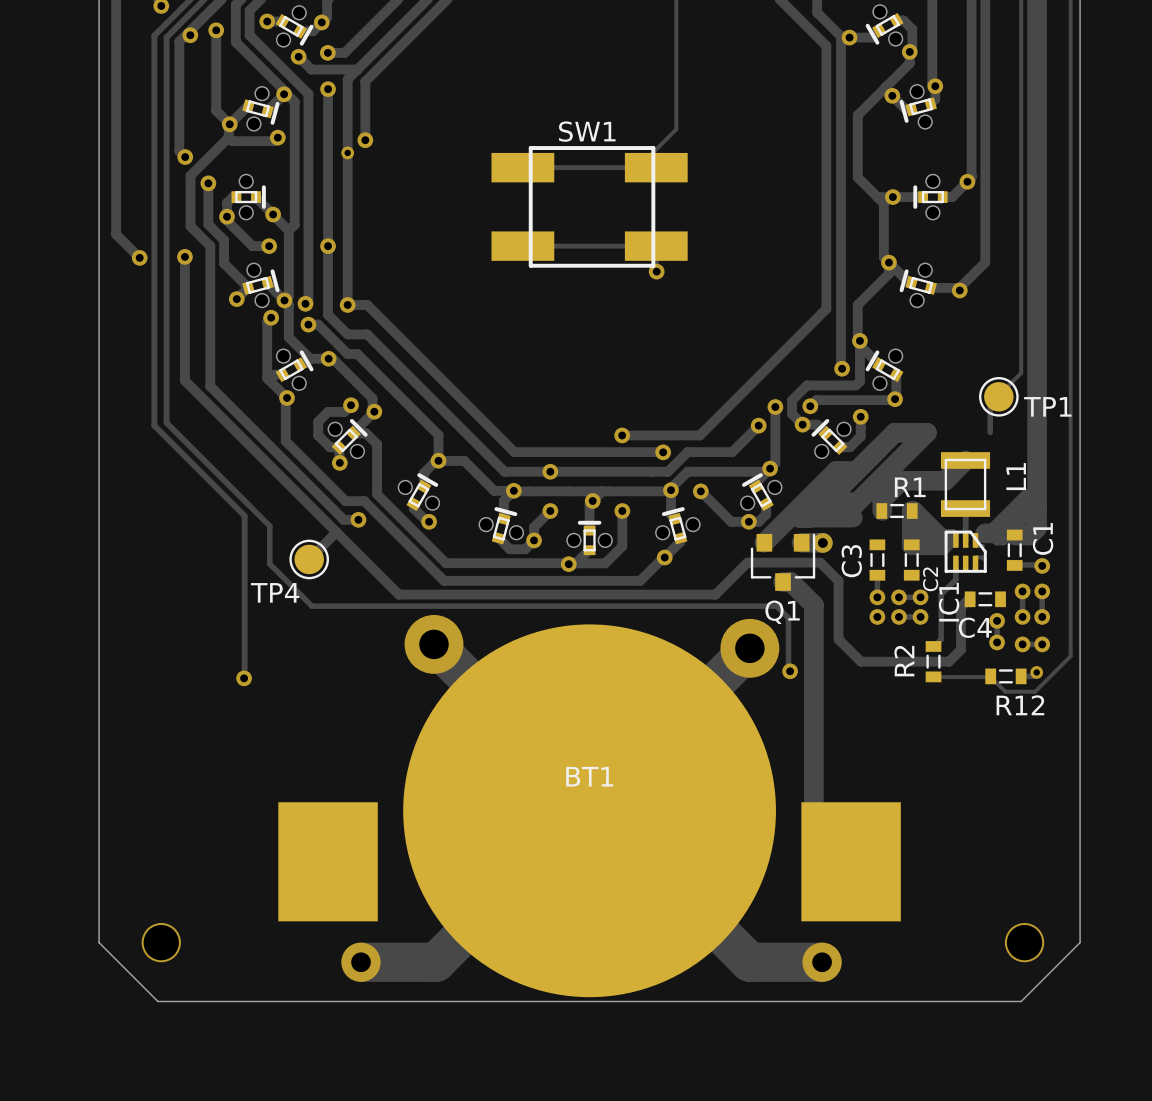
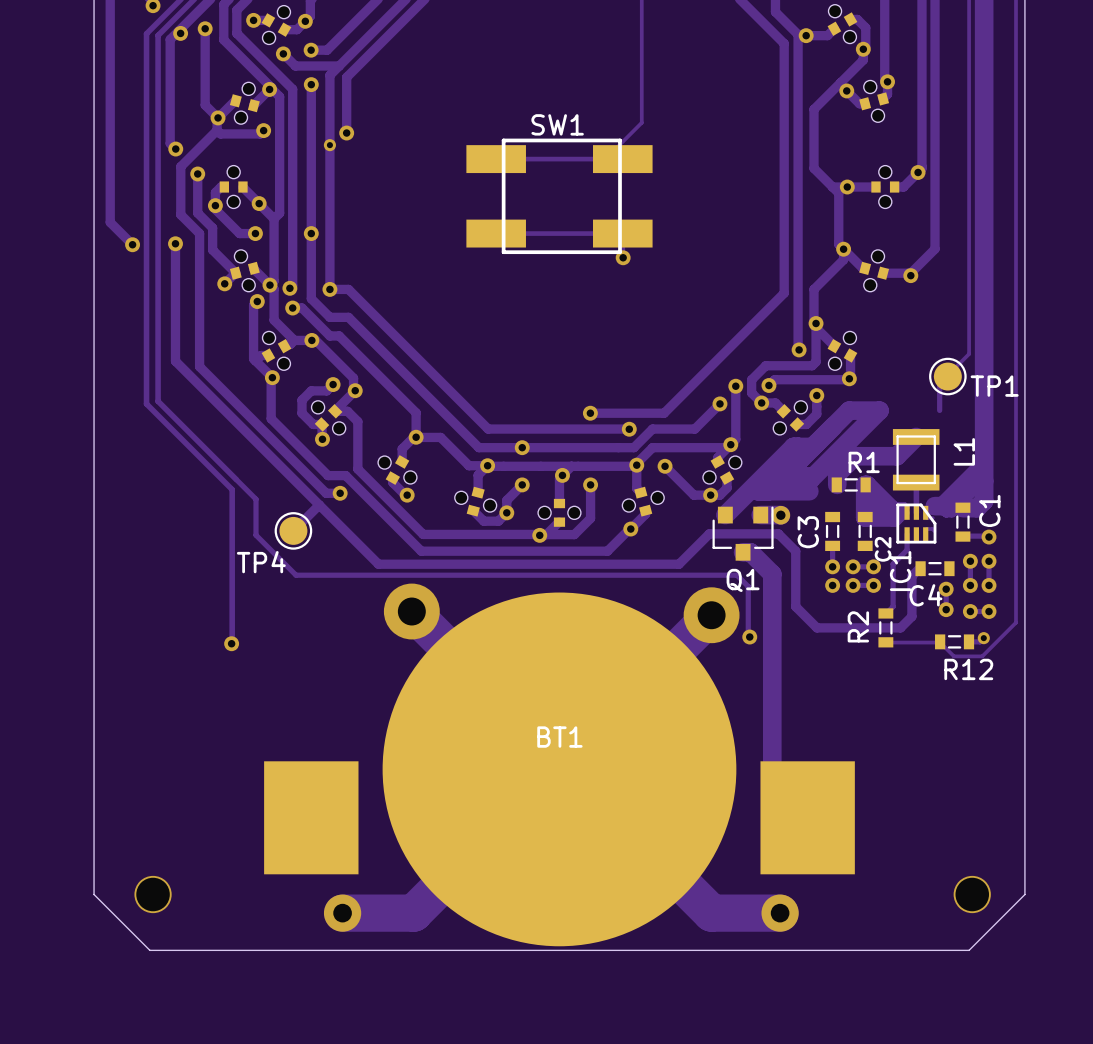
part footprint: [865, 4, 904, 46] -> [827, 4, 858, 44]
part footprint: [275, 5, 314, 47] -> [261, 5, 292, 45]
part footprint: [899, 84, 937, 129] -> [859, 80, 890, 123]
part footprint: [242, 86, 280, 131] -> [229, 82, 260, 125]
part footprint: [231, 174, 266, 220] -> [219, 165, 248, 209]
part footprint: [913, 174, 948, 220] -> [871, 165, 900, 209]
part footprint: [242, 263, 280, 308] -> [229, 249, 260, 292]
part footprint: [899, 263, 937, 308] -> [859, 249, 890, 292]
part footprint: [275, 349, 314, 391] -> [261, 331, 292, 371]
part footprint: [865, 349, 904, 391] -> [827, 331, 858, 371]
part footprint: [328, 418, 368, 459] -> [311, 400, 346, 435]
part footprint: [811, 418, 851, 459] -> [773, 400, 808, 435]
part footprint: [398, 473, 440, 511] -> [378, 455, 417, 485]
part footprint: [740, 473, 782, 511] -> [702, 455, 742, 485]
part footprint: [479, 507, 524, 545] -> [454, 486, 497, 517]
part footprint: [655, 507, 700, 545] -> [622, 486, 665, 517]
part footprint: [567, 520, 613, 556] -> [538, 498, 581, 527]

